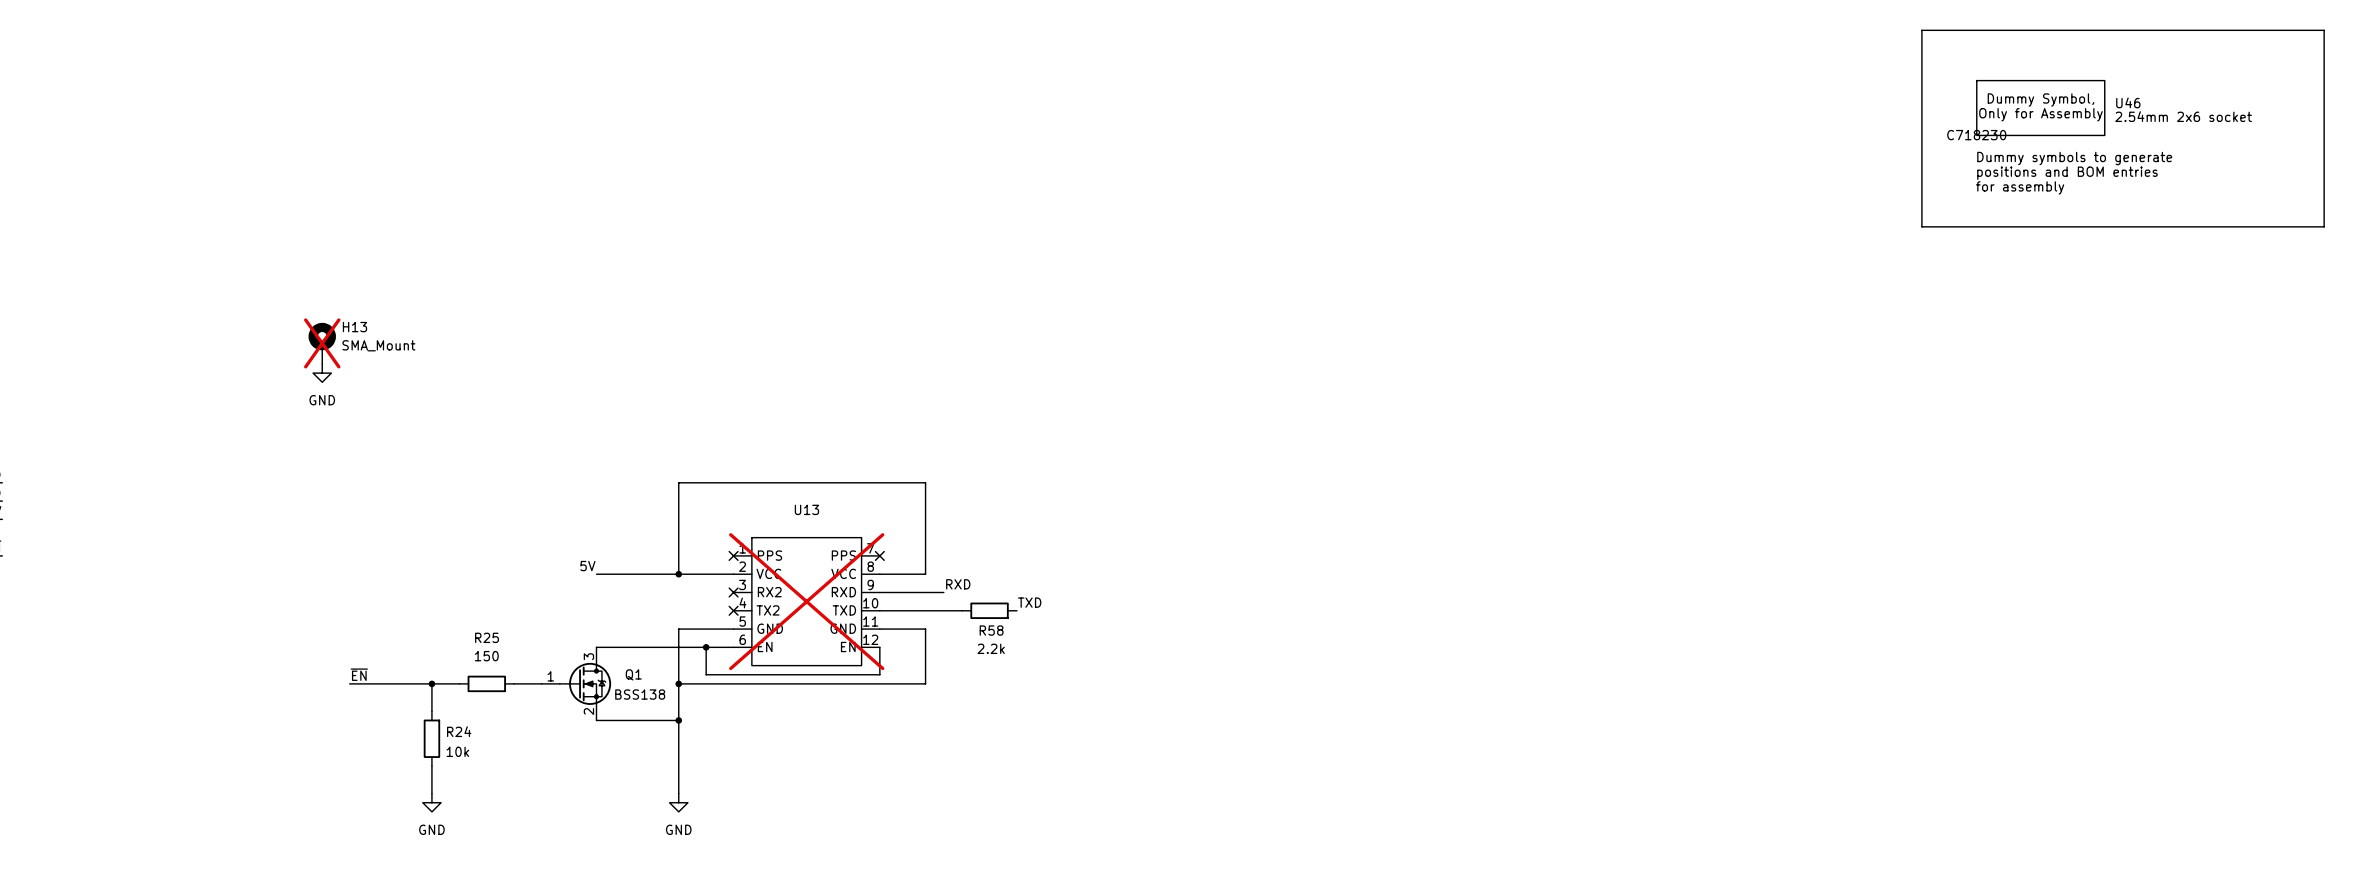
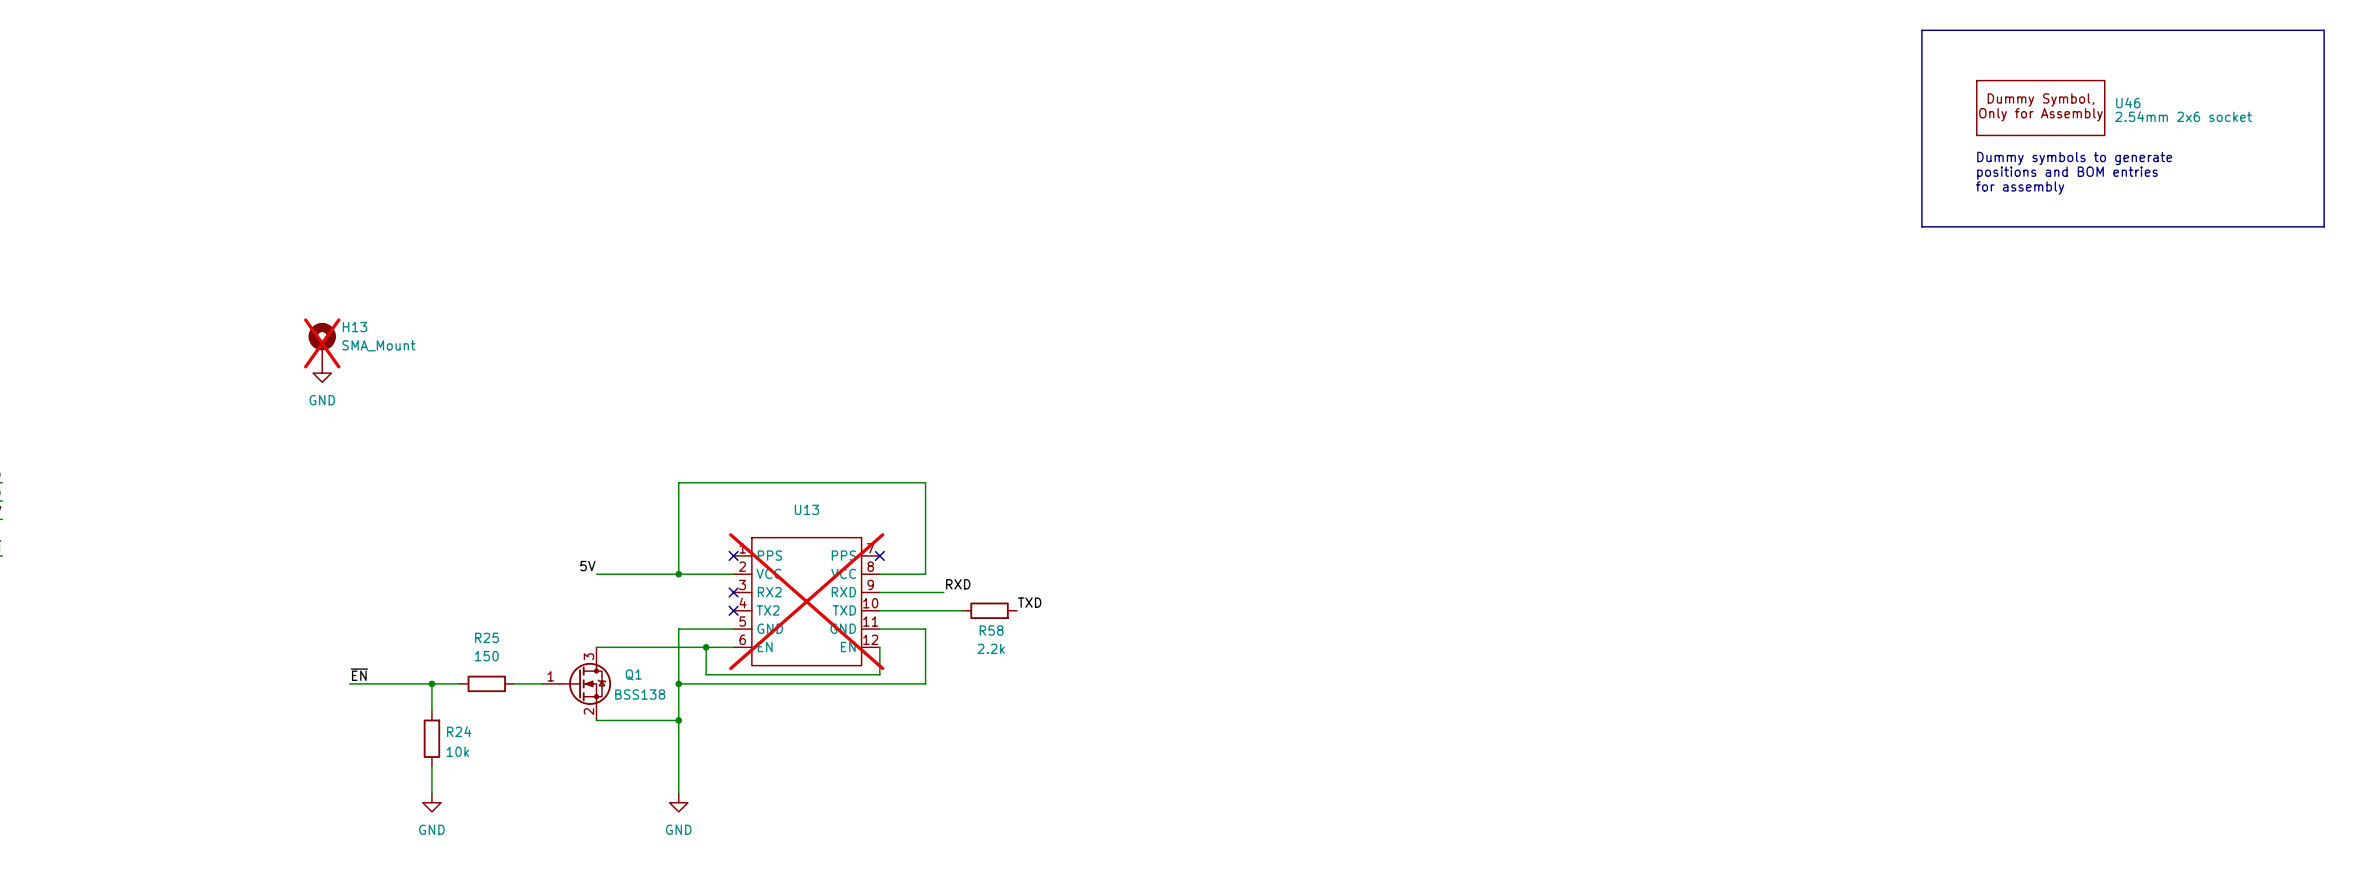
U46 text: C718230 (1976, 135) -> none

